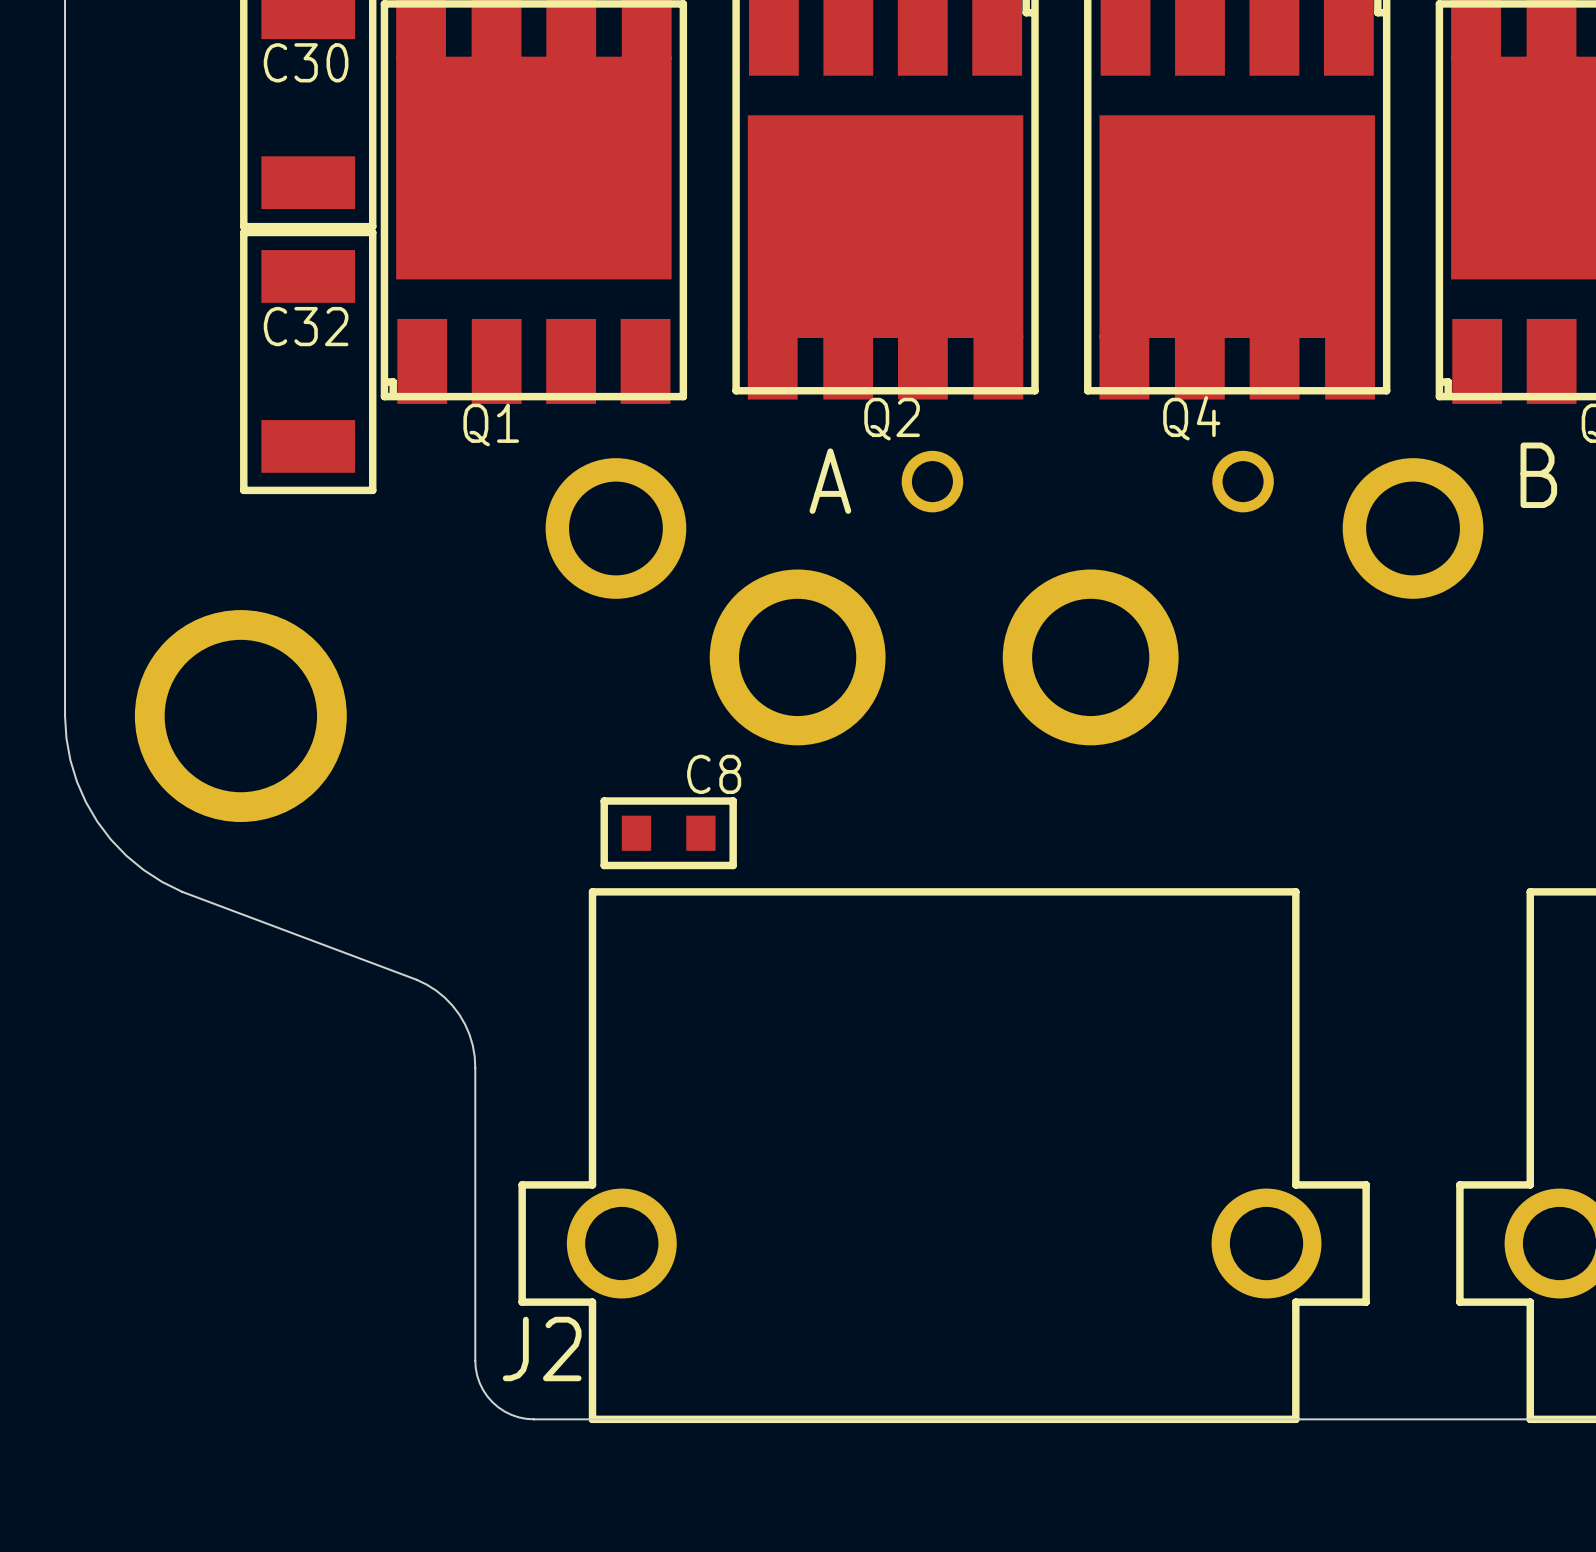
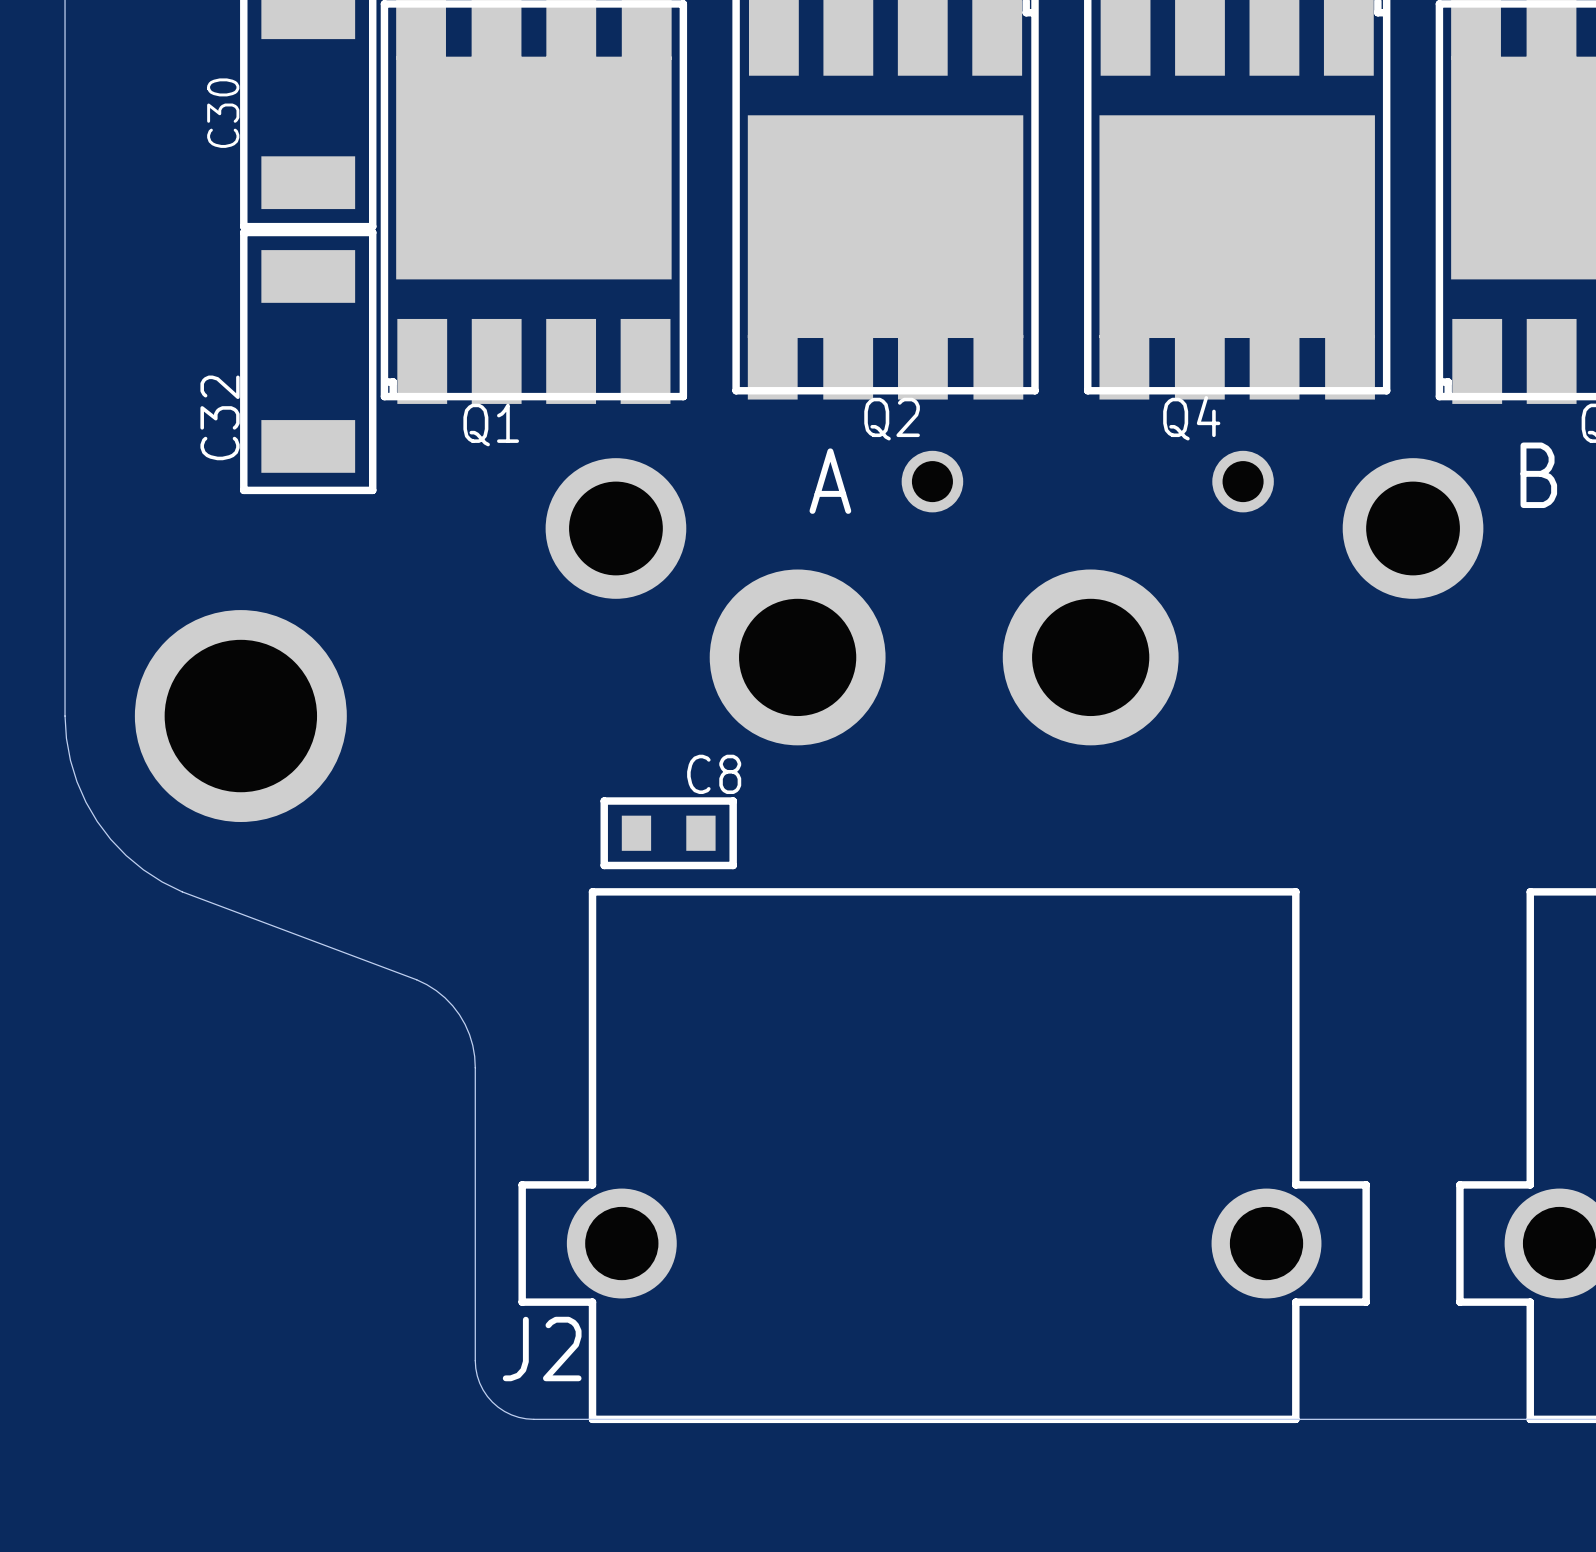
C30 name rotation: 0° (306, 62) -> 90° counterclockwise (223, 113)
C32 name rotation: 0° (306, 326) -> 90° counterclockwise (220, 417)
C32 name position: C32 (306, 326) -> C32 (220, 417)

